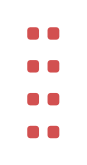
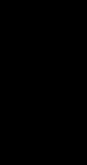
part: (43, 33) -> none
part: (43, 66) -> none
part: (43, 99) -> none
part: (43, 132) -> none

